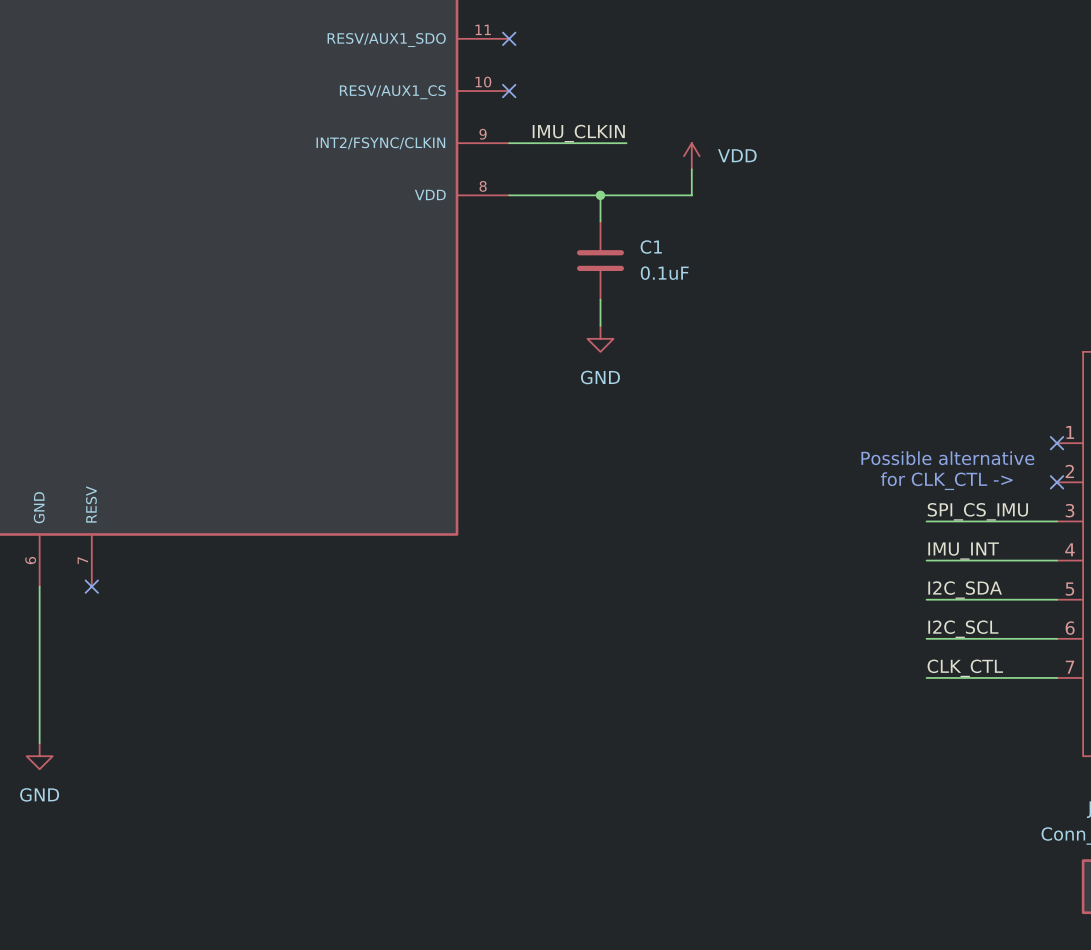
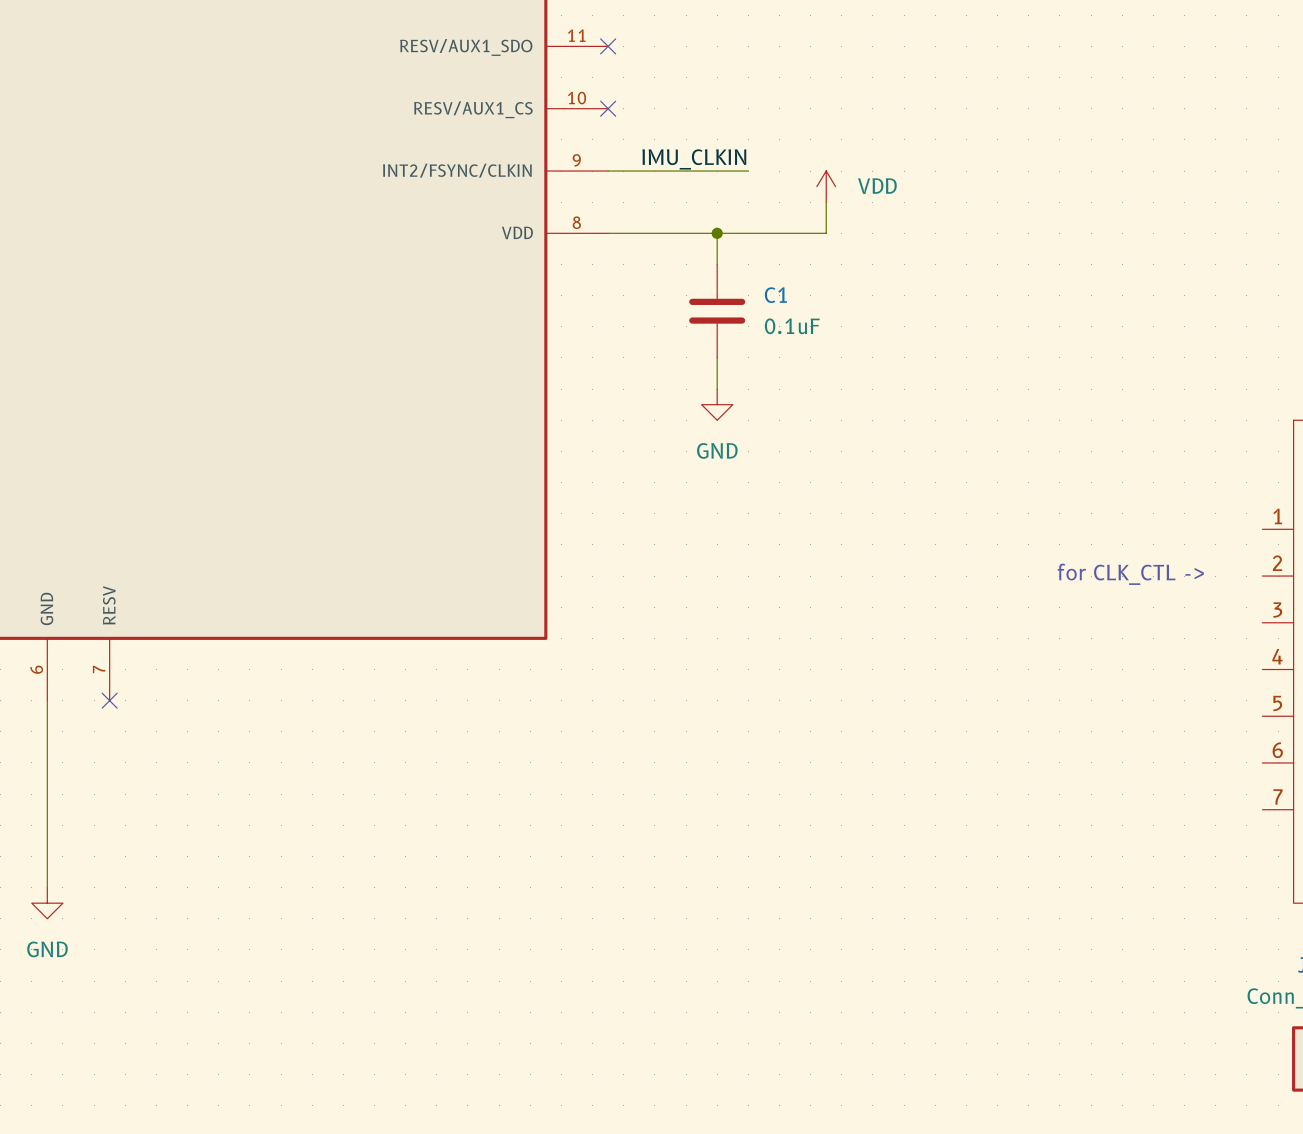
no-connect mark: (1057, 443) -> none
text: Possible alternative (947, 458) -> none
no-connect mark: (1057, 482) -> none
label: SPI_CS_IMU (977, 511) -> none
wire: (926, 521) (1057, 521) -> none
label: IMU_INT (963, 551) -> none
wire: (926, 560) (1057, 560) -> none
label: I2C_SDA (965, 590) -> none
wire: (926, 599) (1057, 599) -> none
label: I2C_SCL (963, 629) -> none
wire: (926, 638) (1057, 638) -> none
label: CLK_CTL (965, 668) -> none
wire: (926, 677) (1057, 677) -> none

